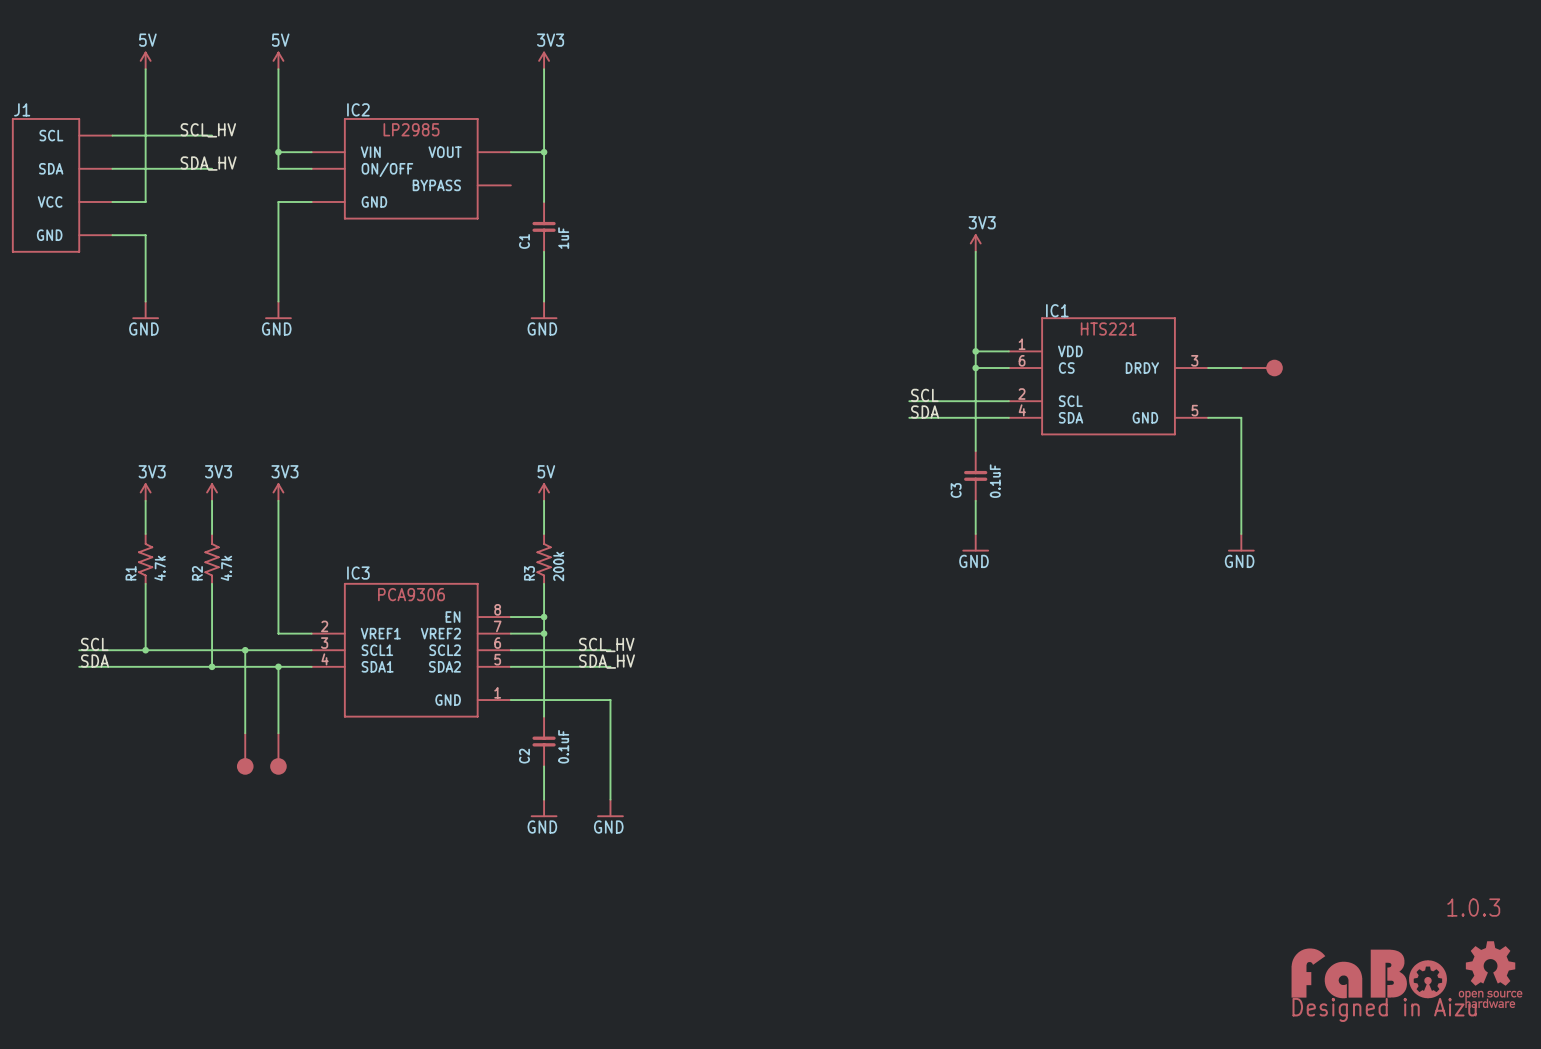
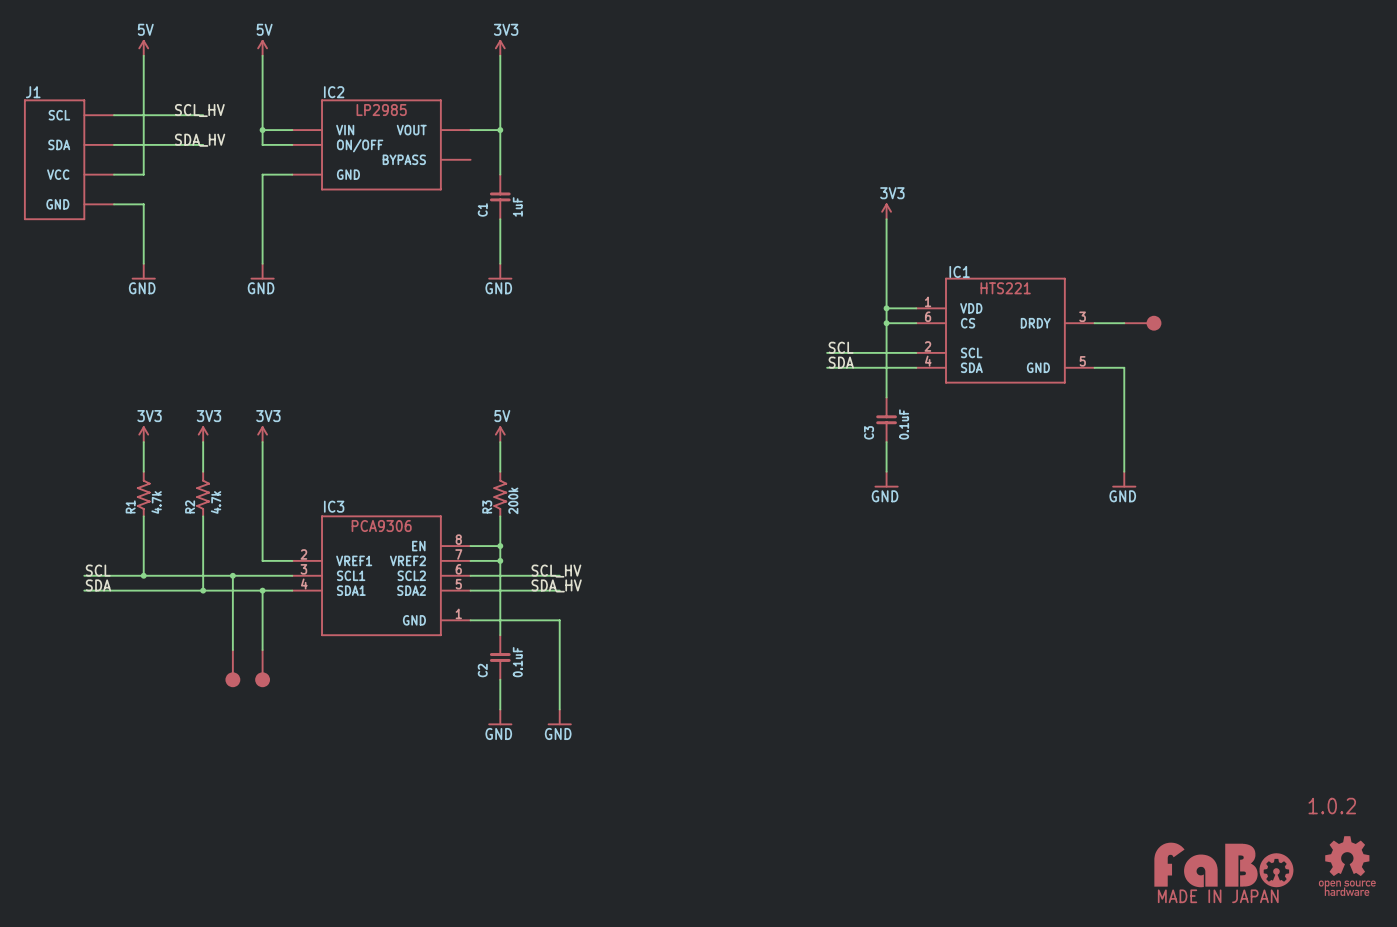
text: 1.0.3 (1473, 907) -> 1.0.2 (1332, 806)
part: none -> (1223, 864)
part: (1369, 973) -> none

